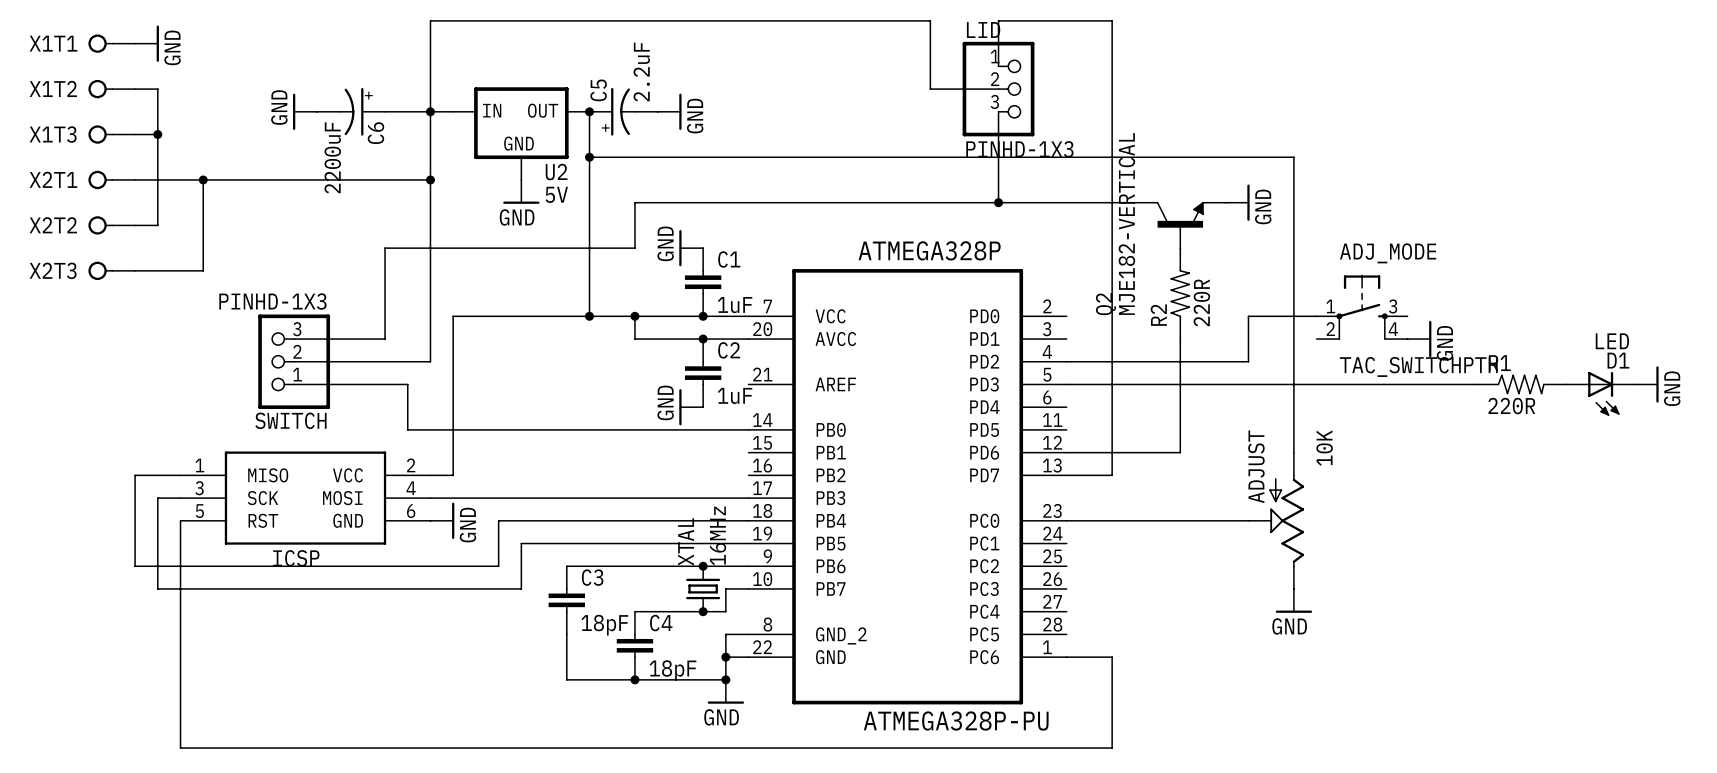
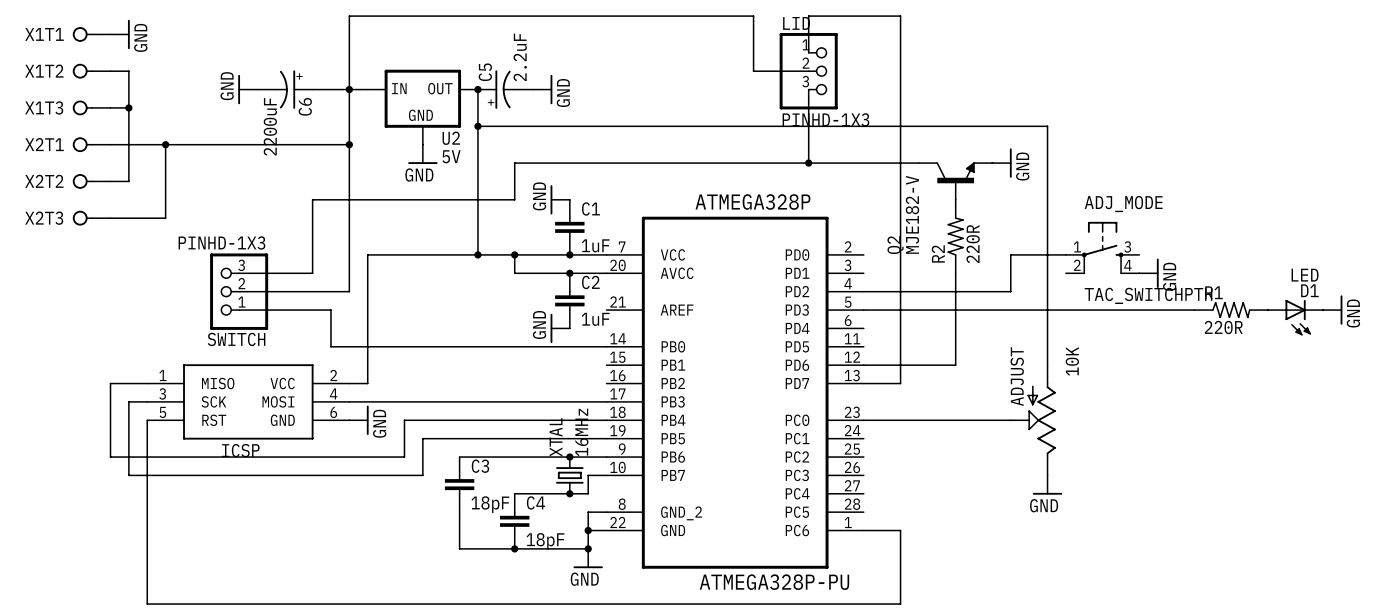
Q2 value: MJE182-VERTICAL (1126, 223) -> MJE182-V (912, 214)

